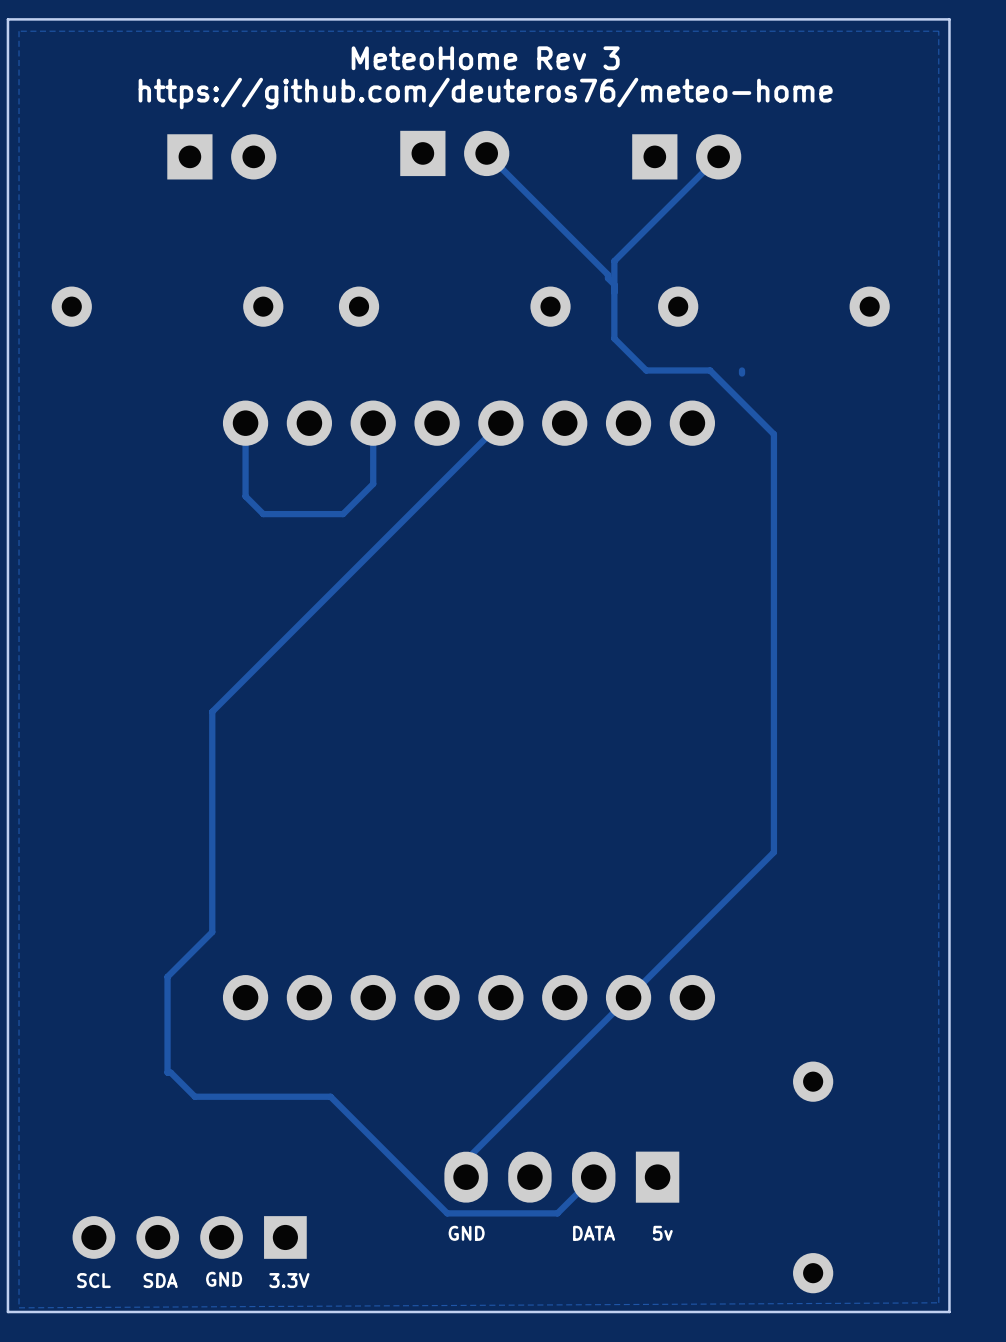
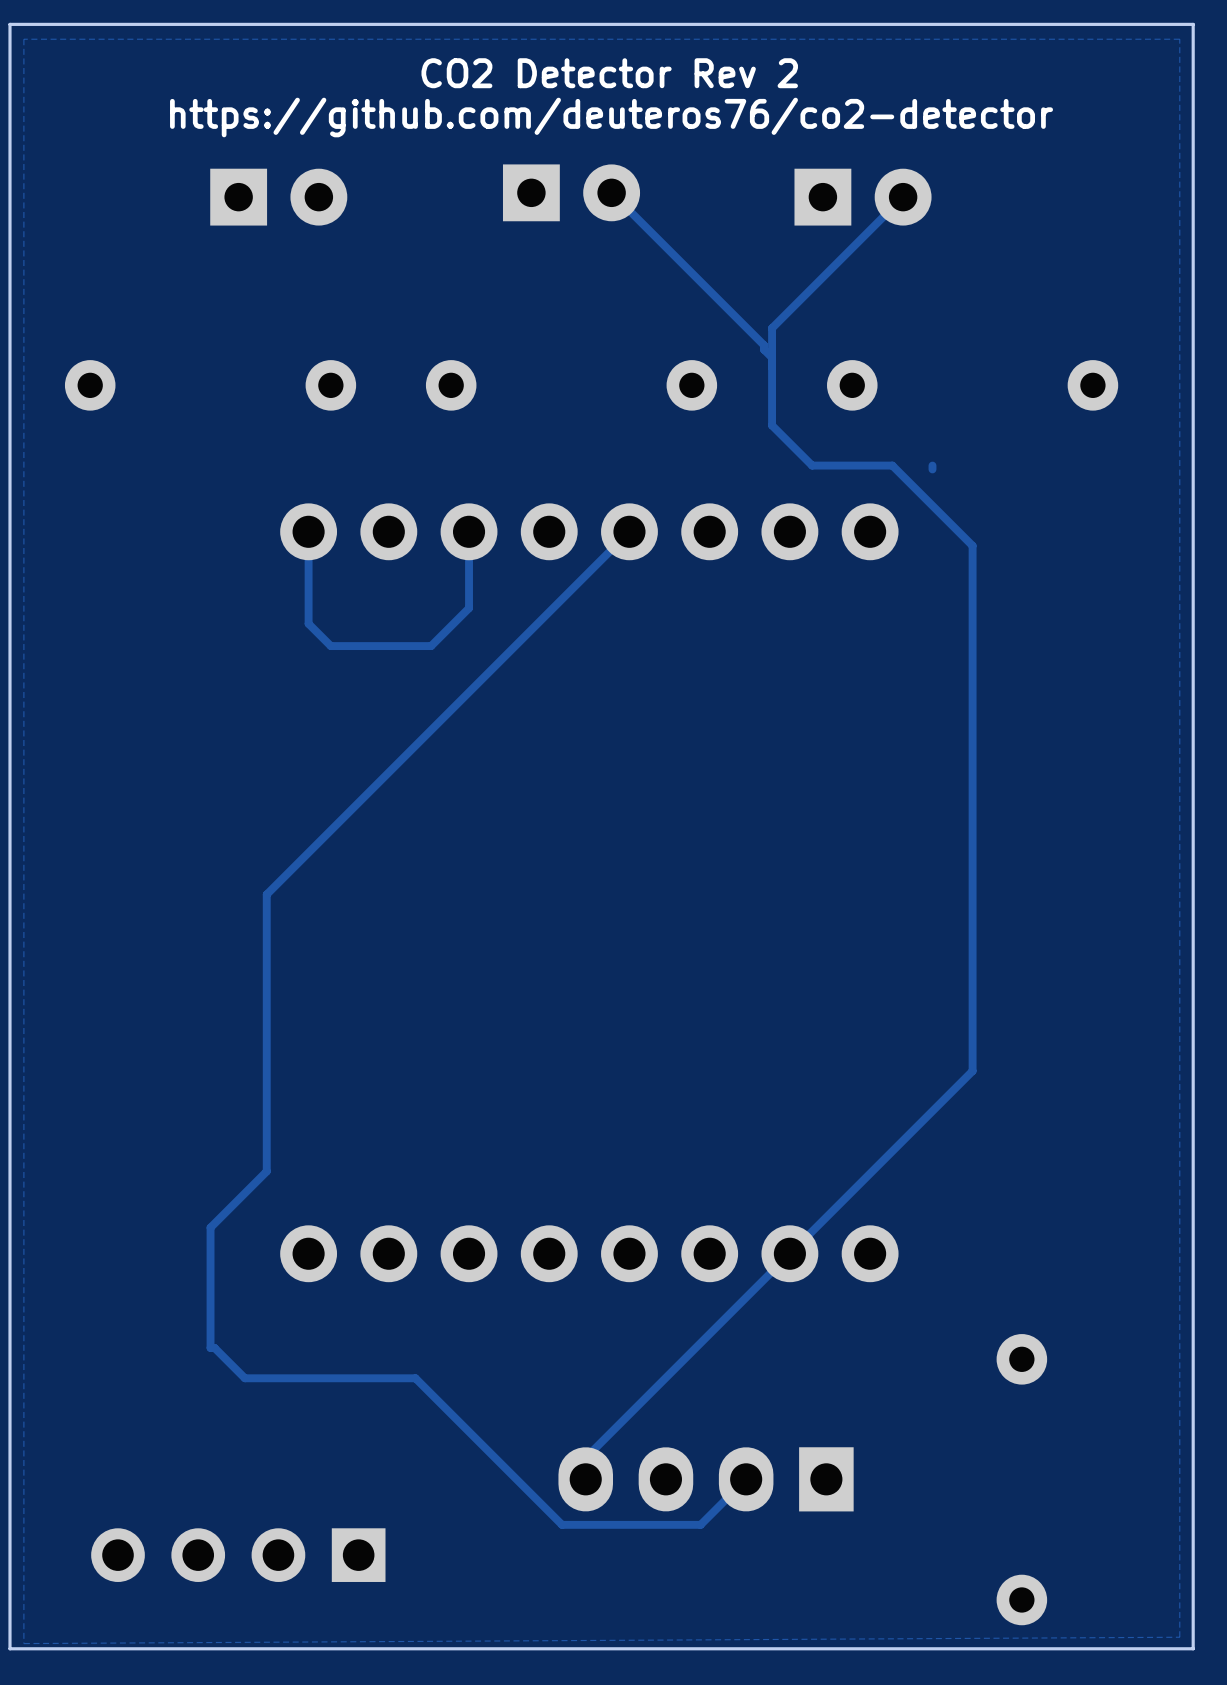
text: MeteoHome Rev 3 (485, 58) -> CO2 Detector Rev 2 (609, 73)
text: https://github.com/deuteros76/meteo-home (485, 93) -> https://github.com/deuteros76/co2-detector (611, 117)
text: GND (466, 1233) -> none
text: DATA (594, 1233) -> none
text: 5v (662, 1233) -> none
text: GND (224, 1279) -> none
text: SCL (93, 1280) -> none
text: SDA (160, 1280) -> none
text: 3.3V (289, 1280) -> none

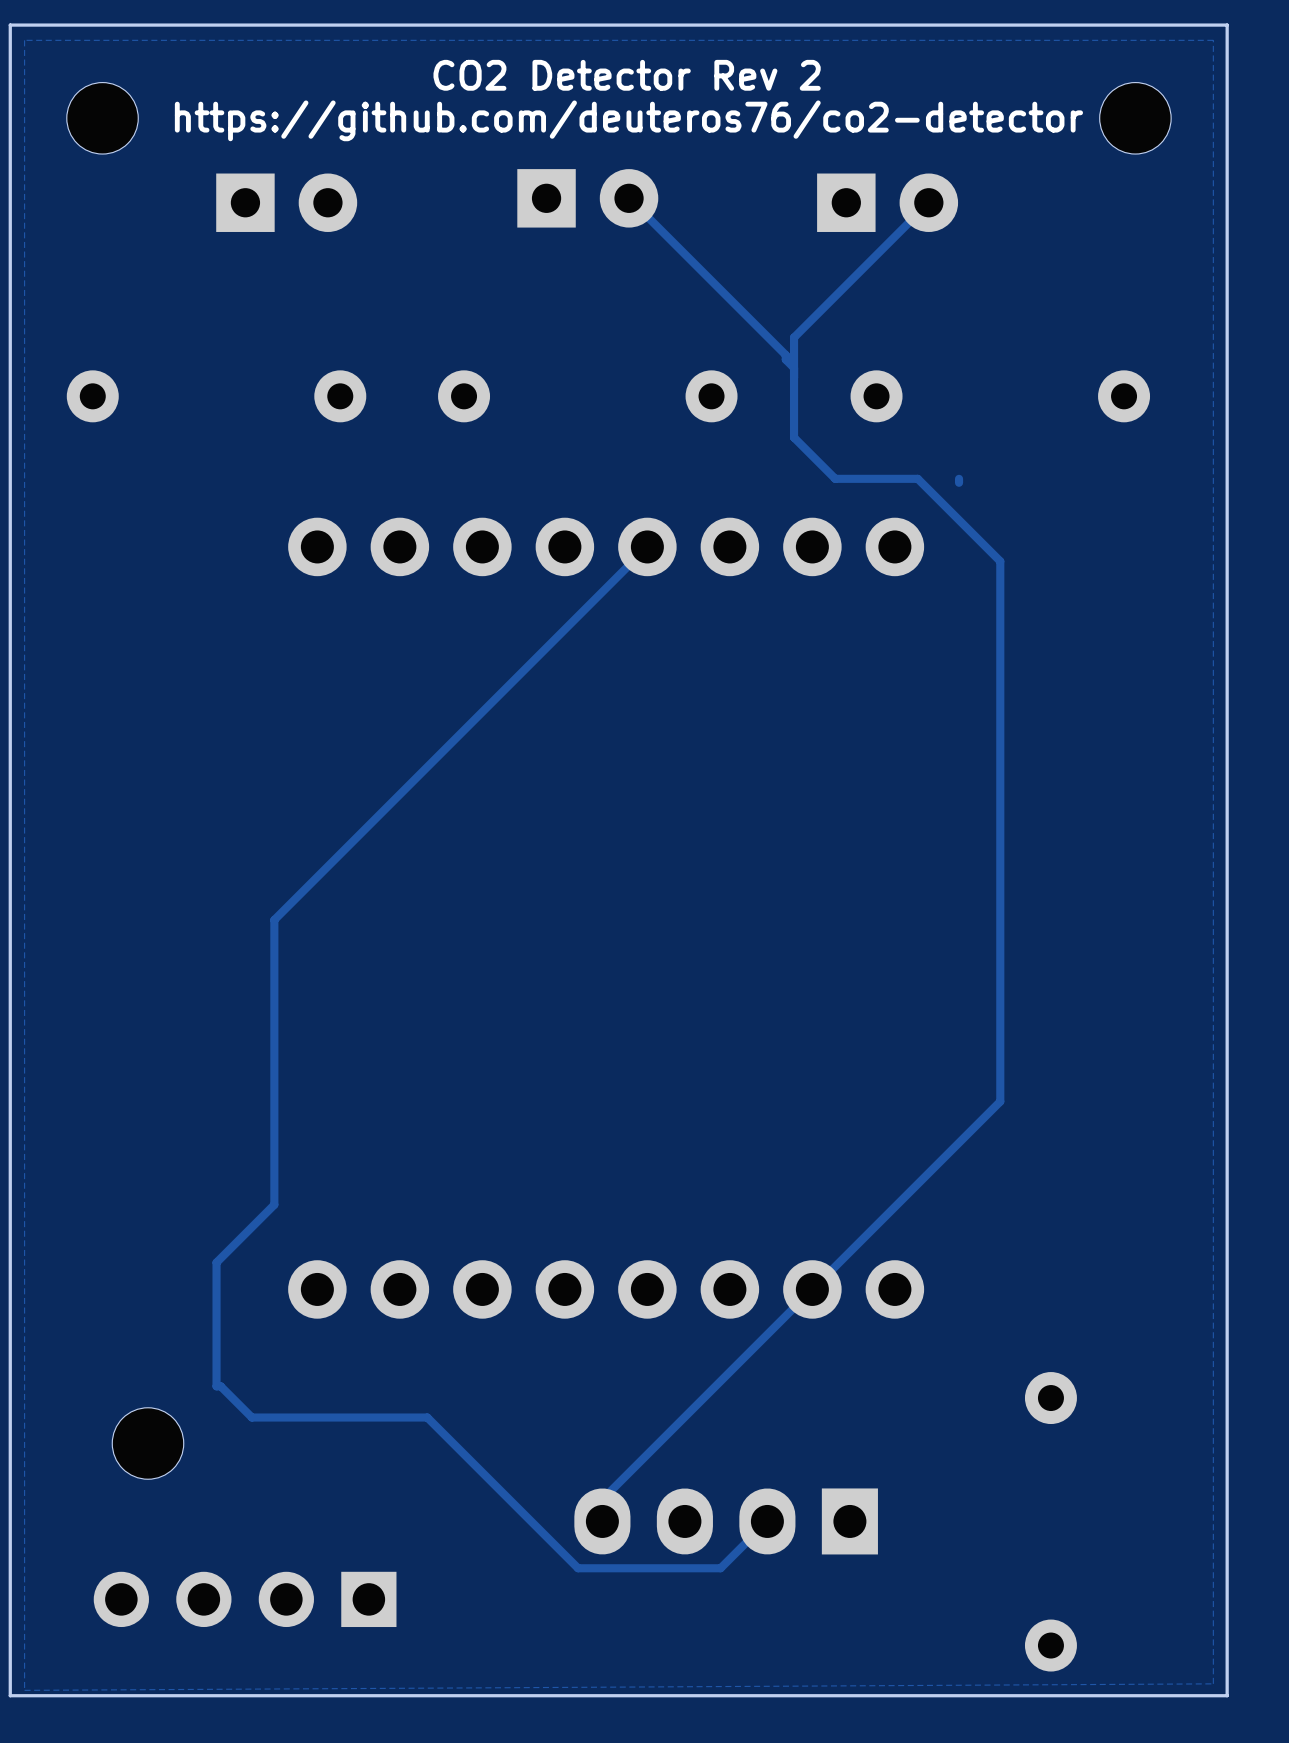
part: none -> (102, 118)
part: none -> (1135, 118)
track: (469, 531) (469, 608) (431, 646) (330, 646) (308, 623) (308, 531) -> none
part: none -> (148, 1443)

